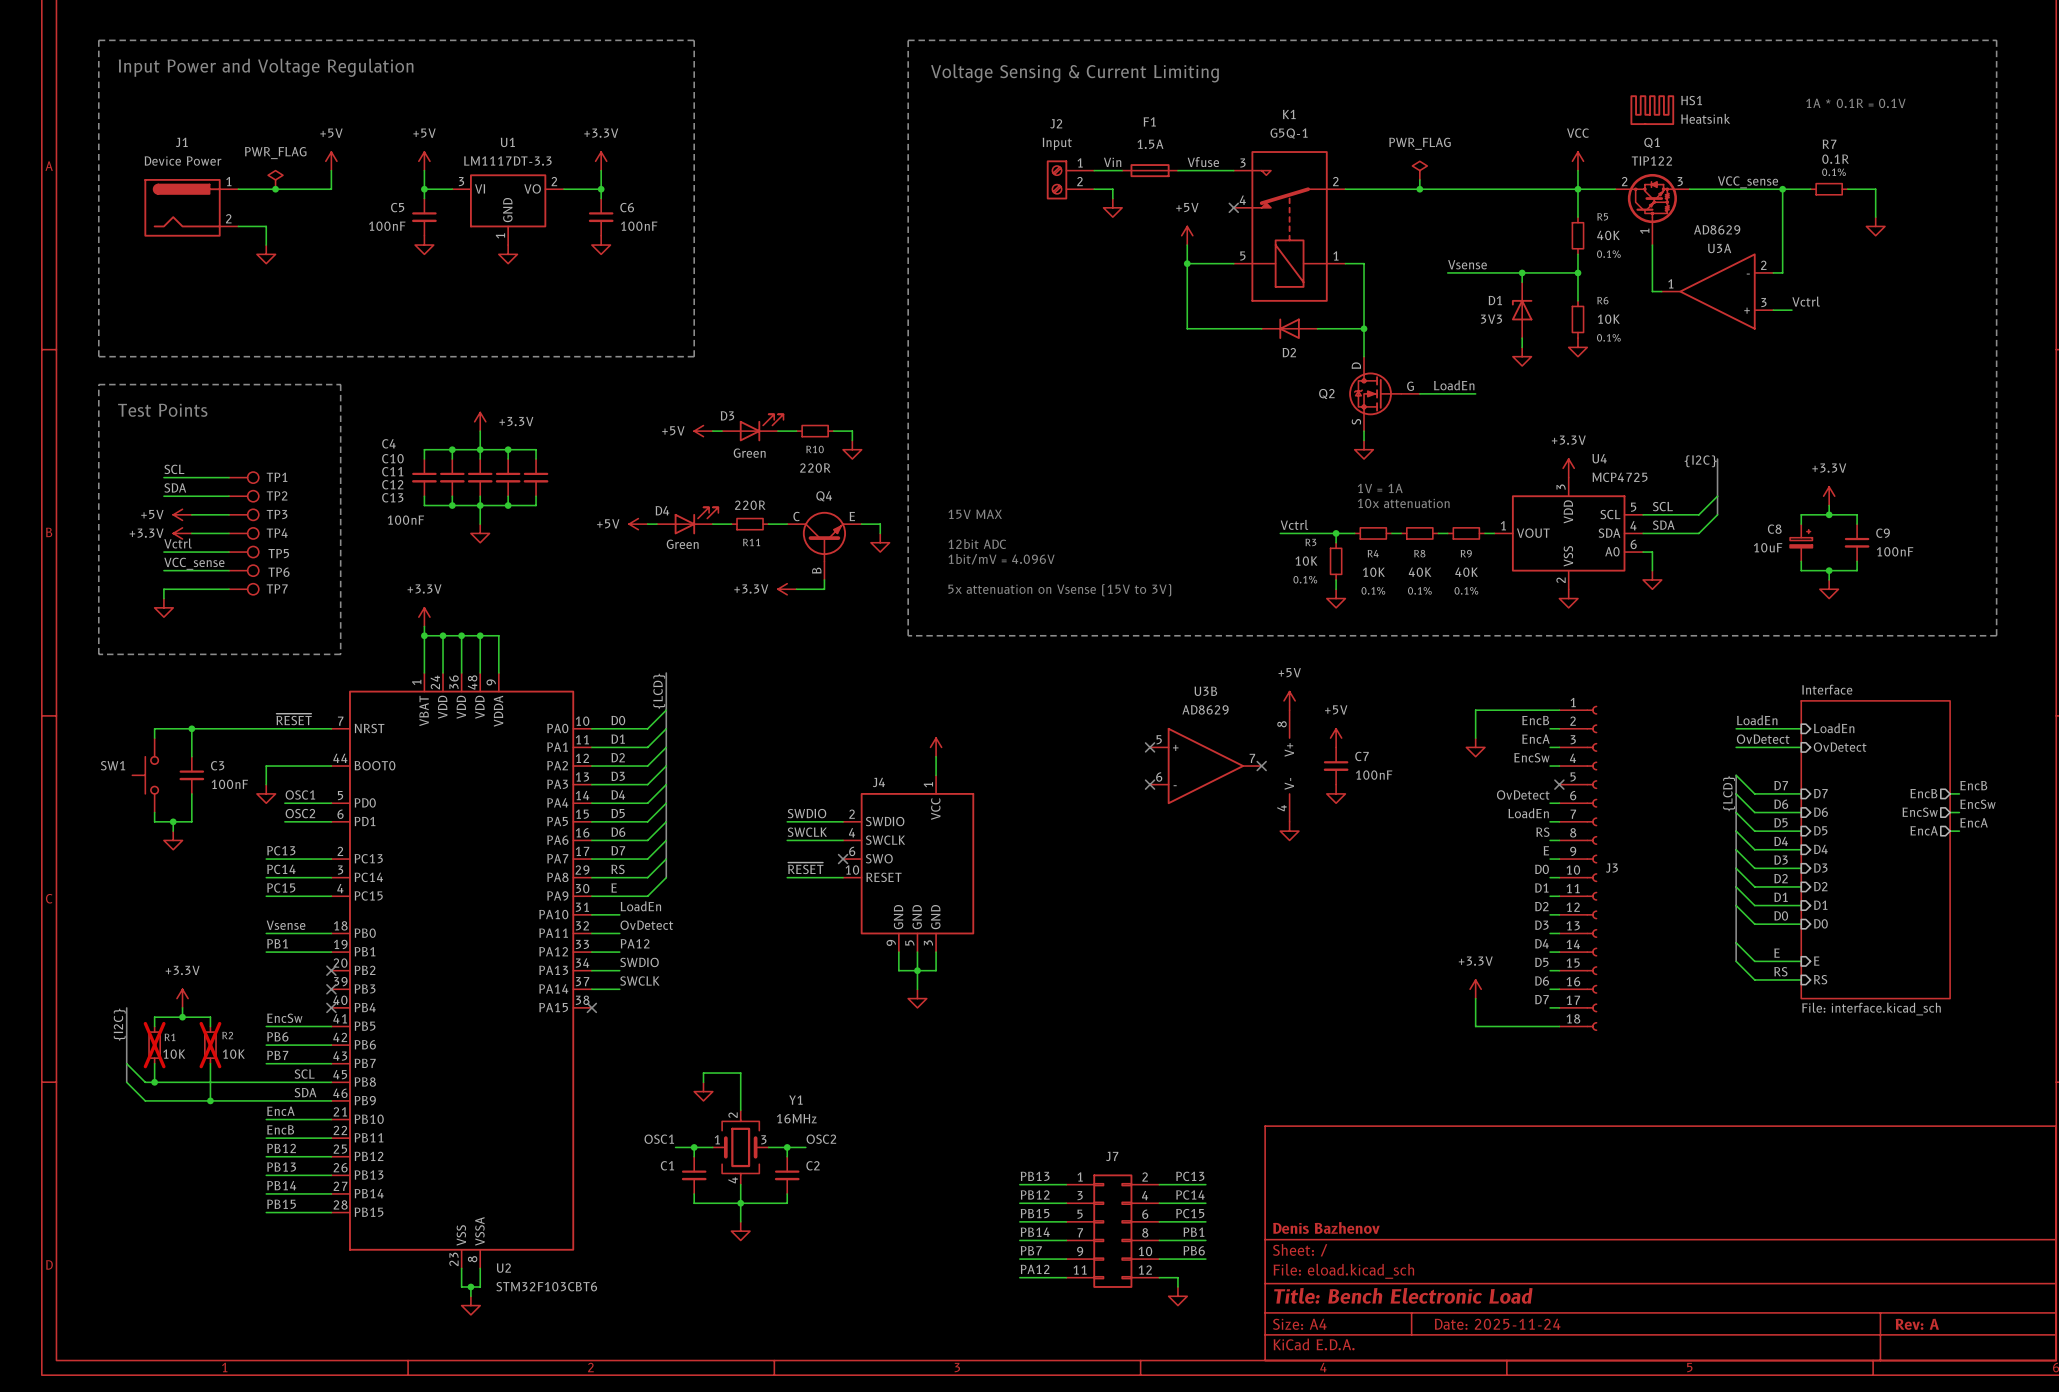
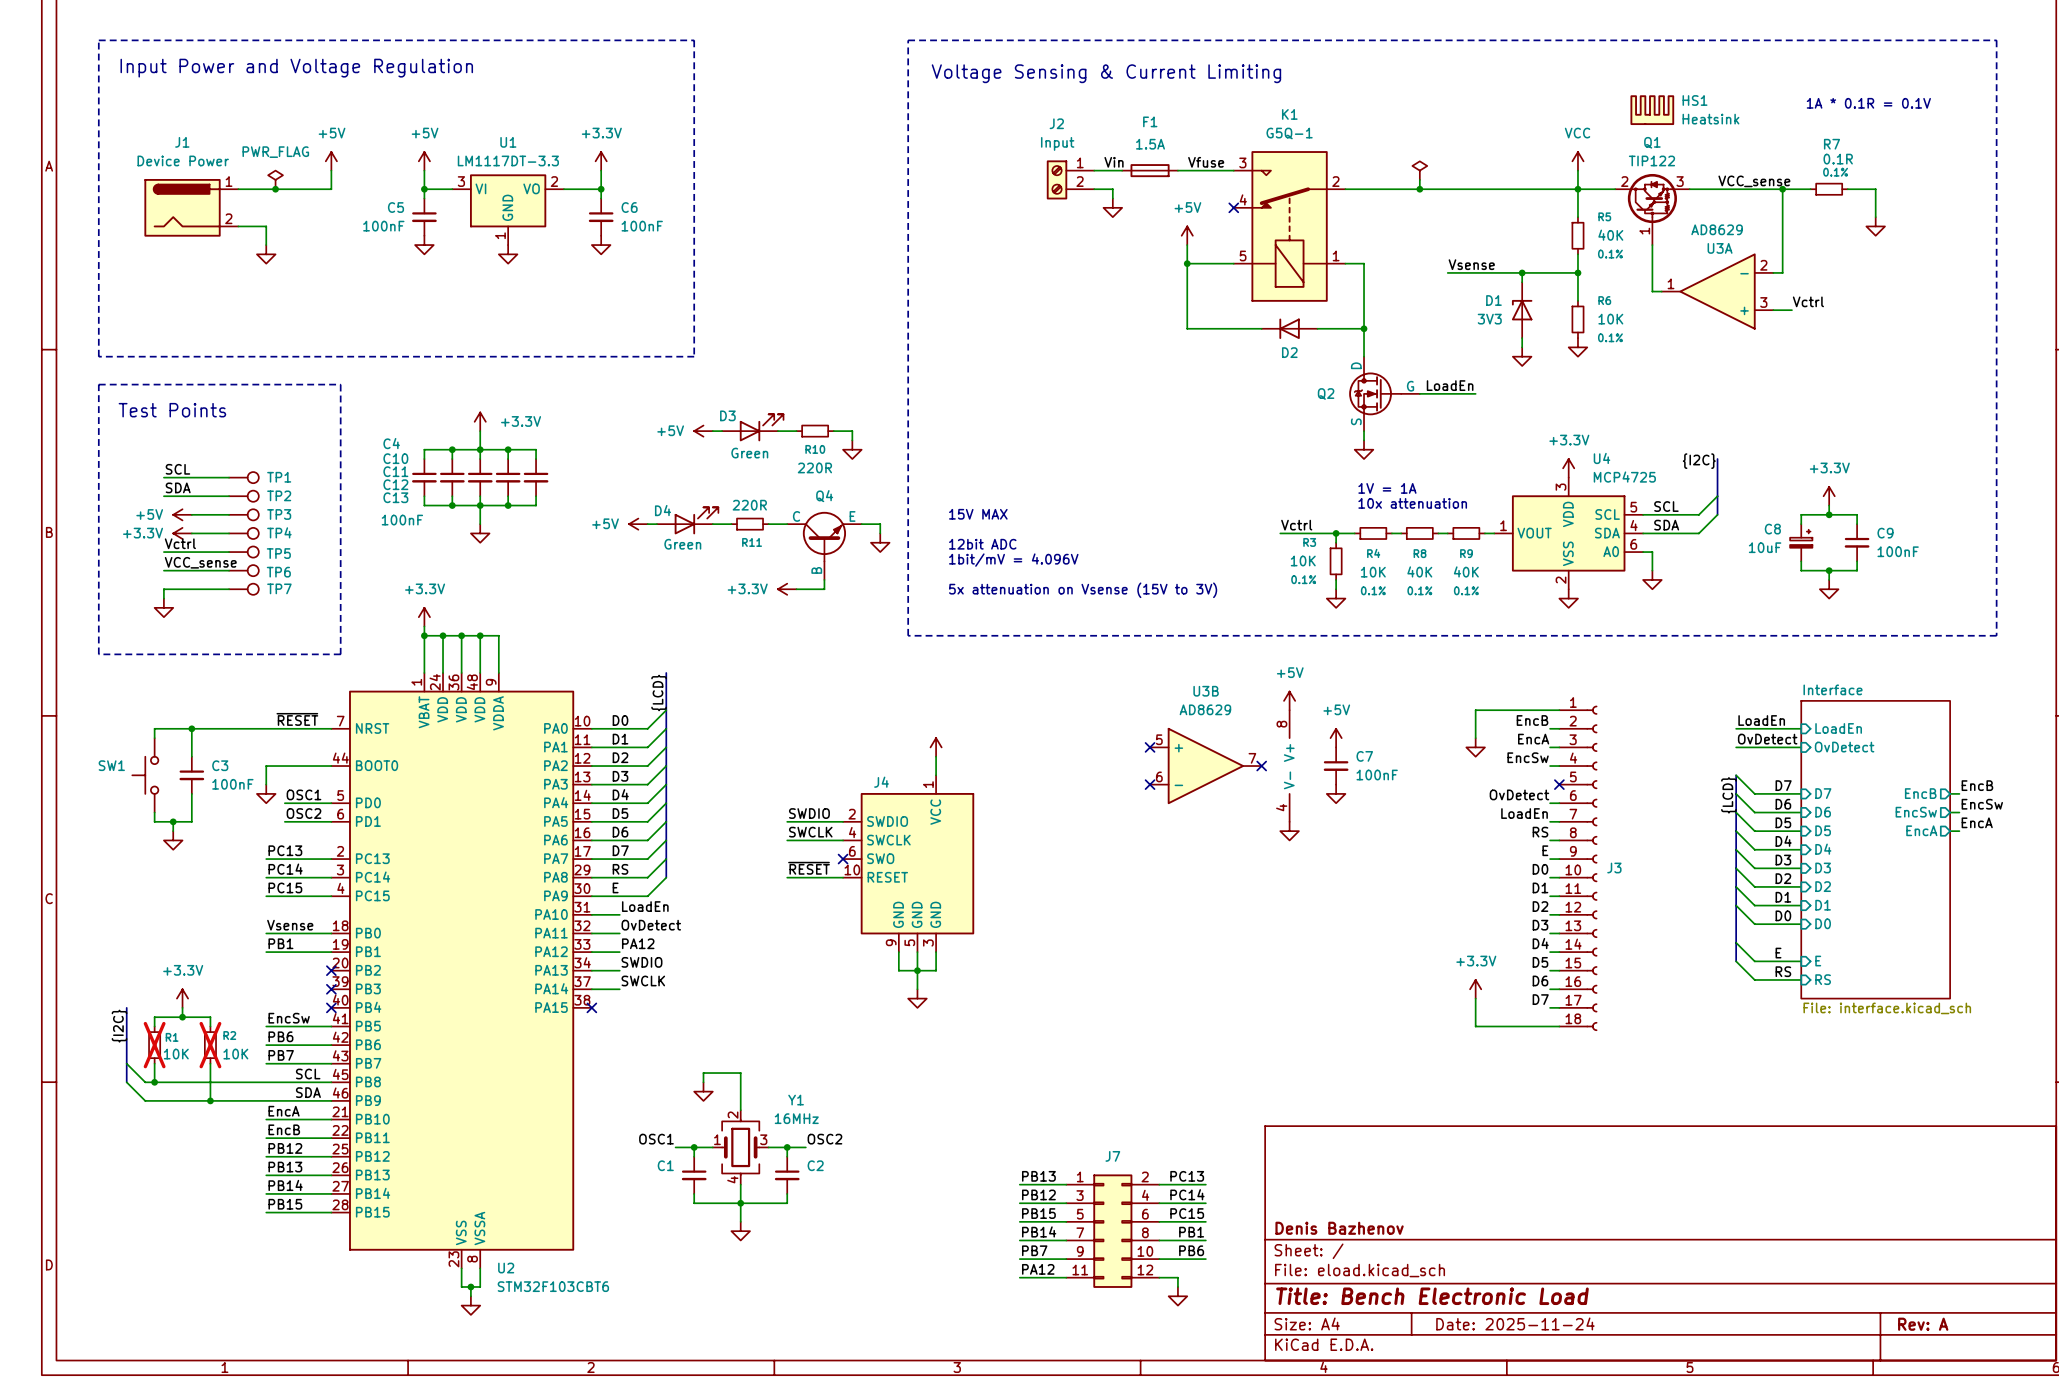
power symbol text: PWR_FLAG (1420, 143) -> none

